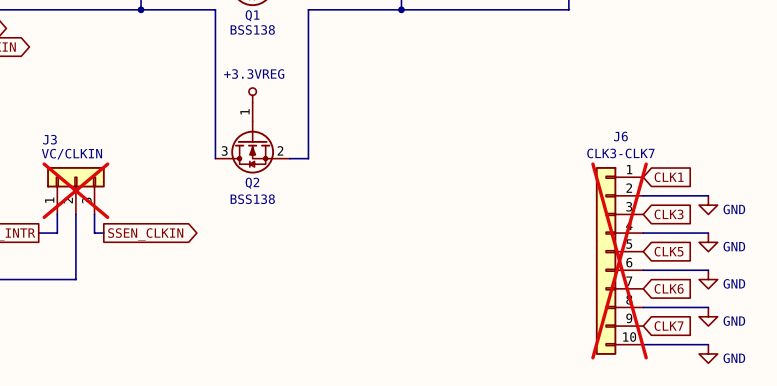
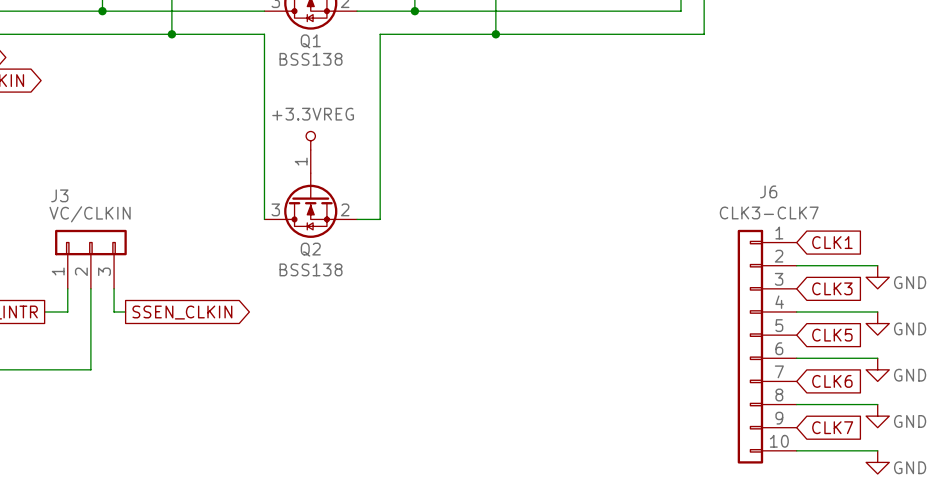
J3 do-not-place cross: (75, 190) -> none
J6 do-not-place cross: (619, 260) -> none

